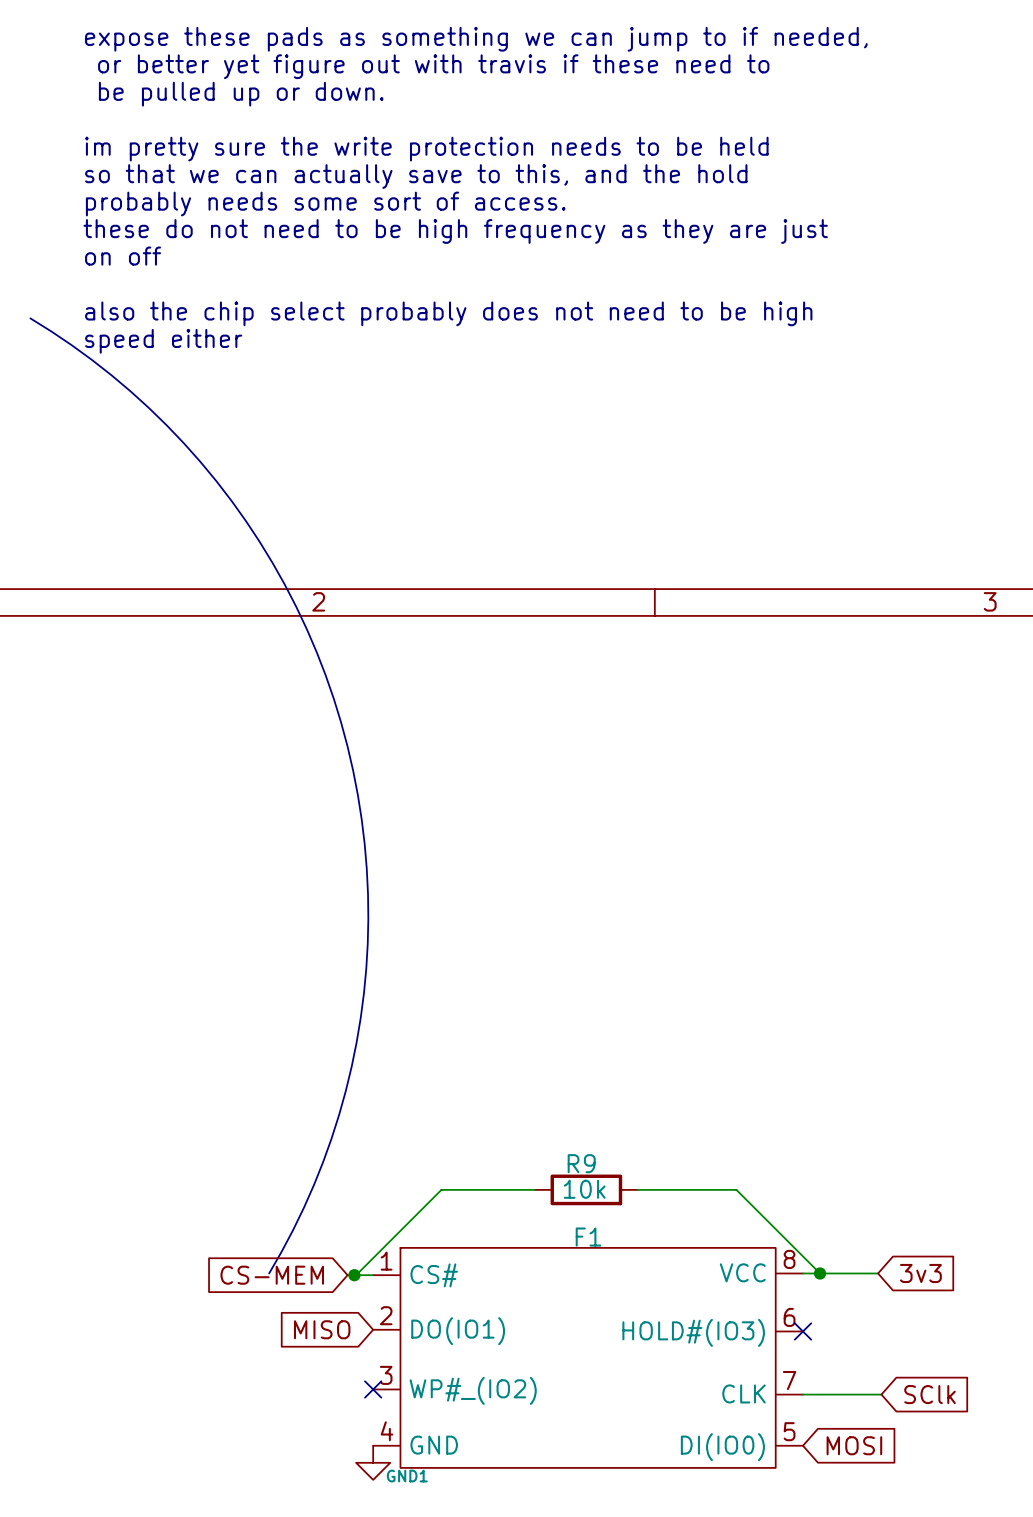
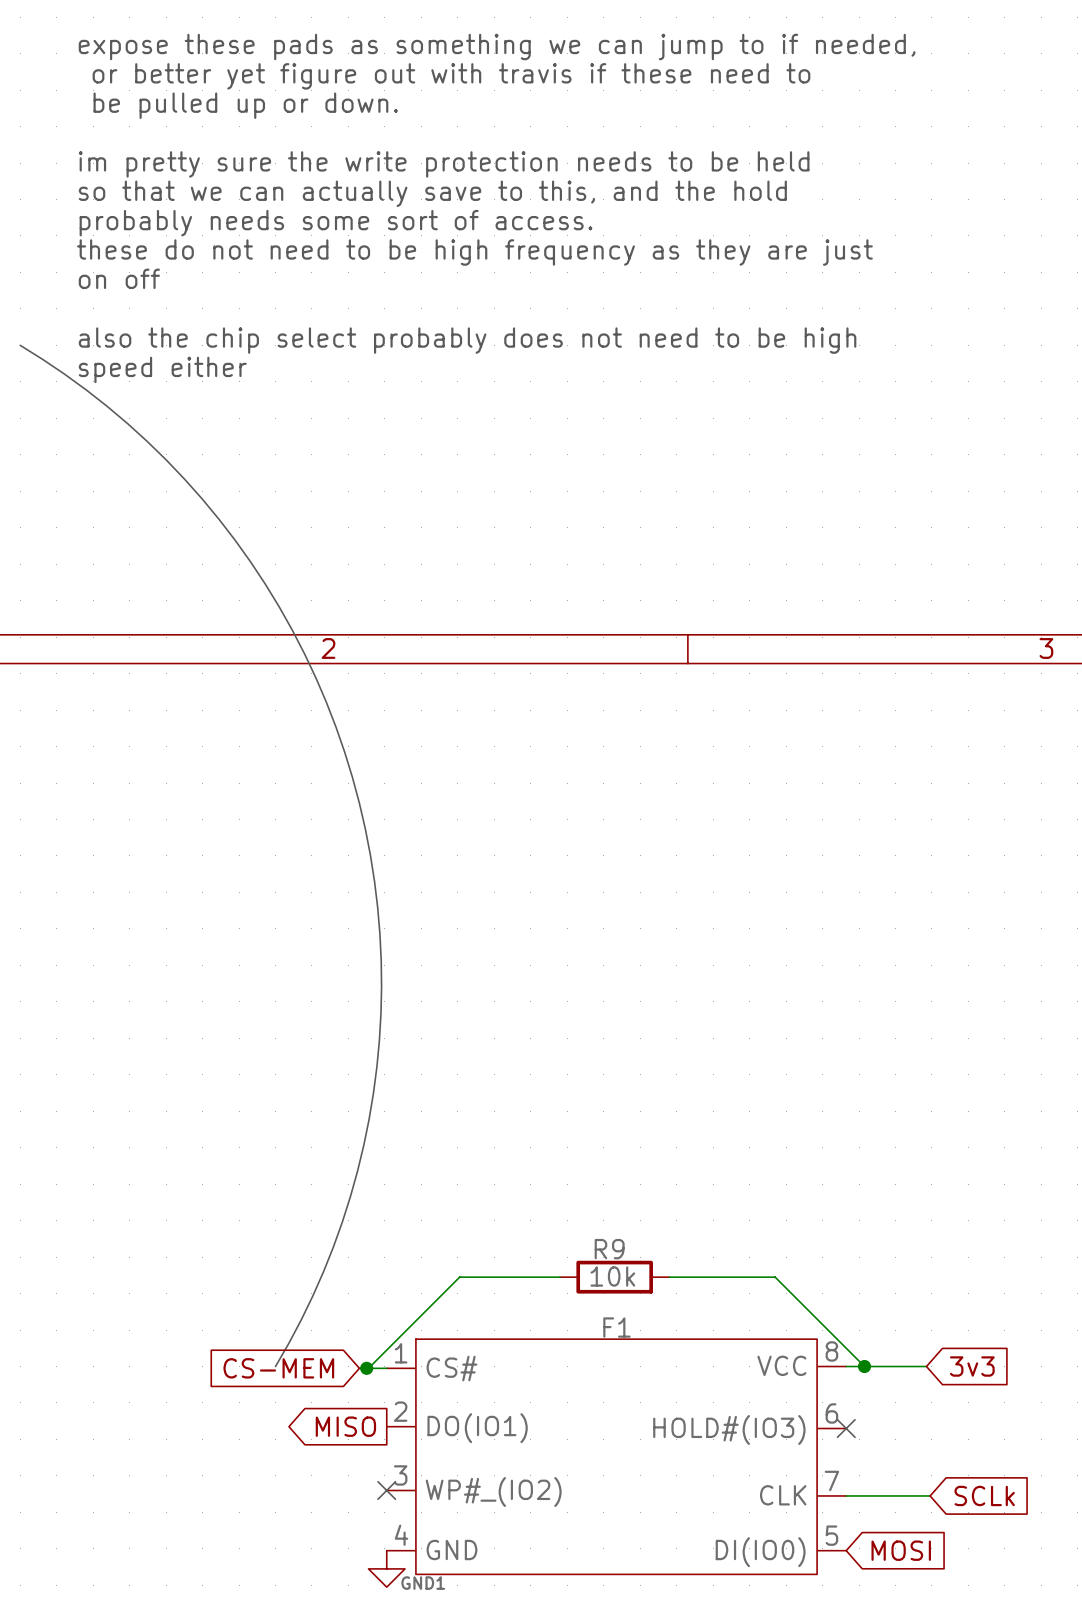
global label shape: input (322, 1329) -> output (345, 1426)
global label: SClk (930, 1394) -> SCLk (984, 1495)

